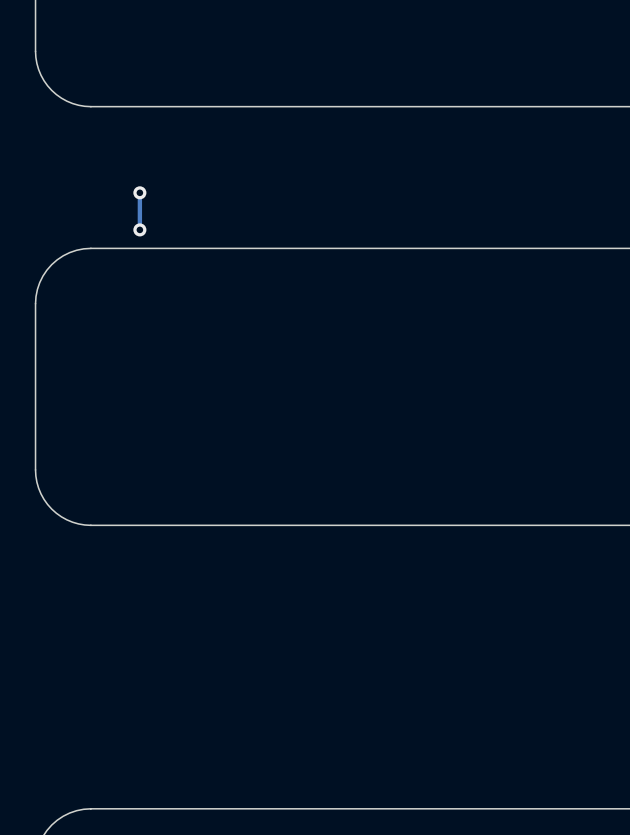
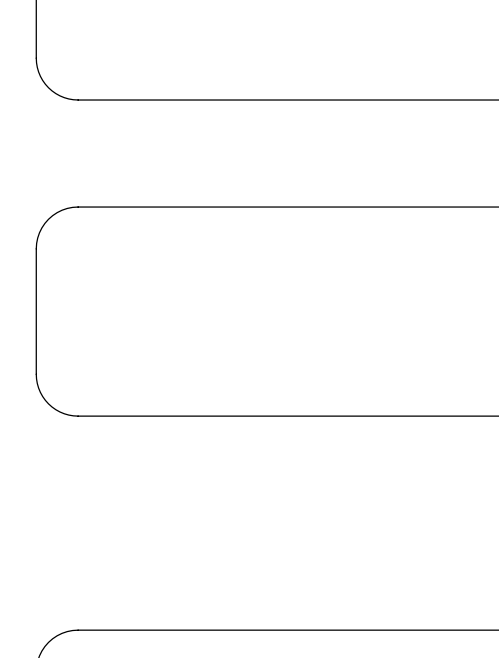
track: (139, 192) (139, 229) -> none
via: (139, 192) -> none
via: (139, 229) -> none

